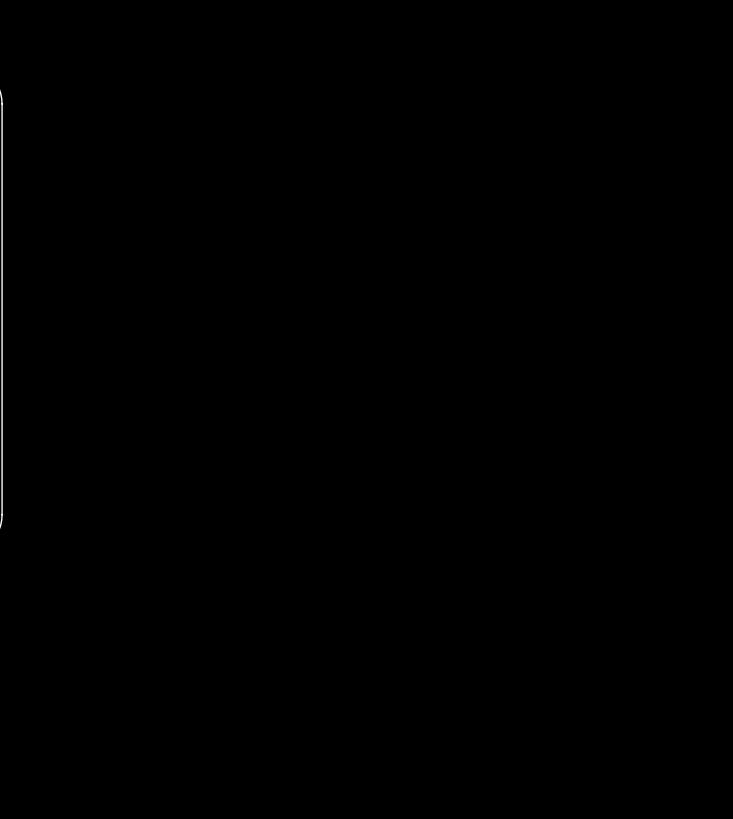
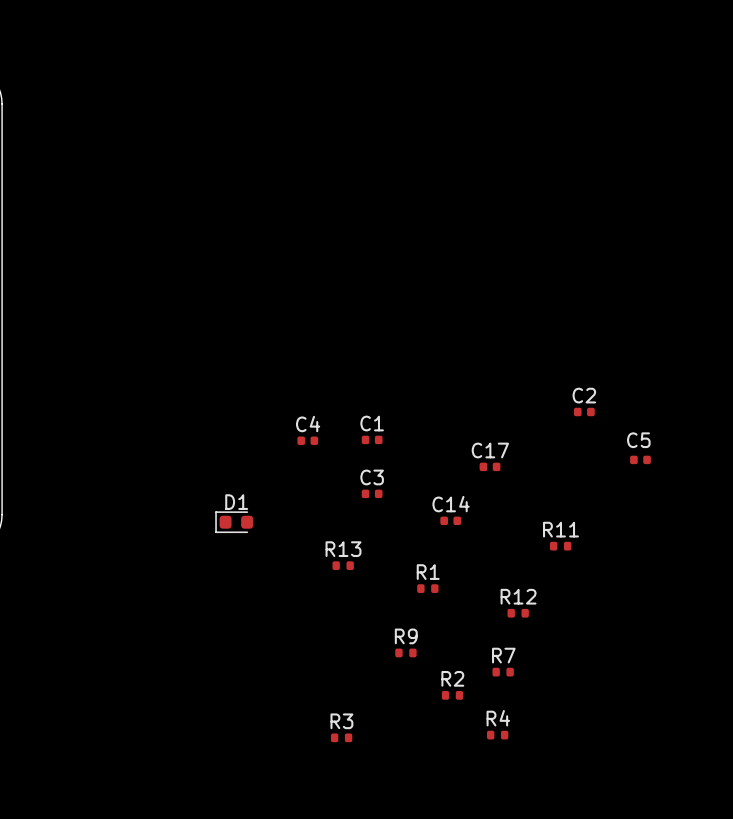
C2: none -> (584, 411)
C1: none -> (372, 439)
C4: none -> (307, 440)
C5: none -> (640, 459)
C17: none -> (490, 466)
C3: none -> (372, 493)
C14: none -> (450, 520)
D1: none -> (234, 522)
R11: none -> (560, 546)
R13: none -> (343, 565)
R1: none -> (427, 588)
R12: none -> (518, 613)
R9: none -> (405, 652)
R7: none -> (503, 672)
R2: none -> (452, 695)
R4: none -> (497, 735)
R3: none -> (341, 737)

